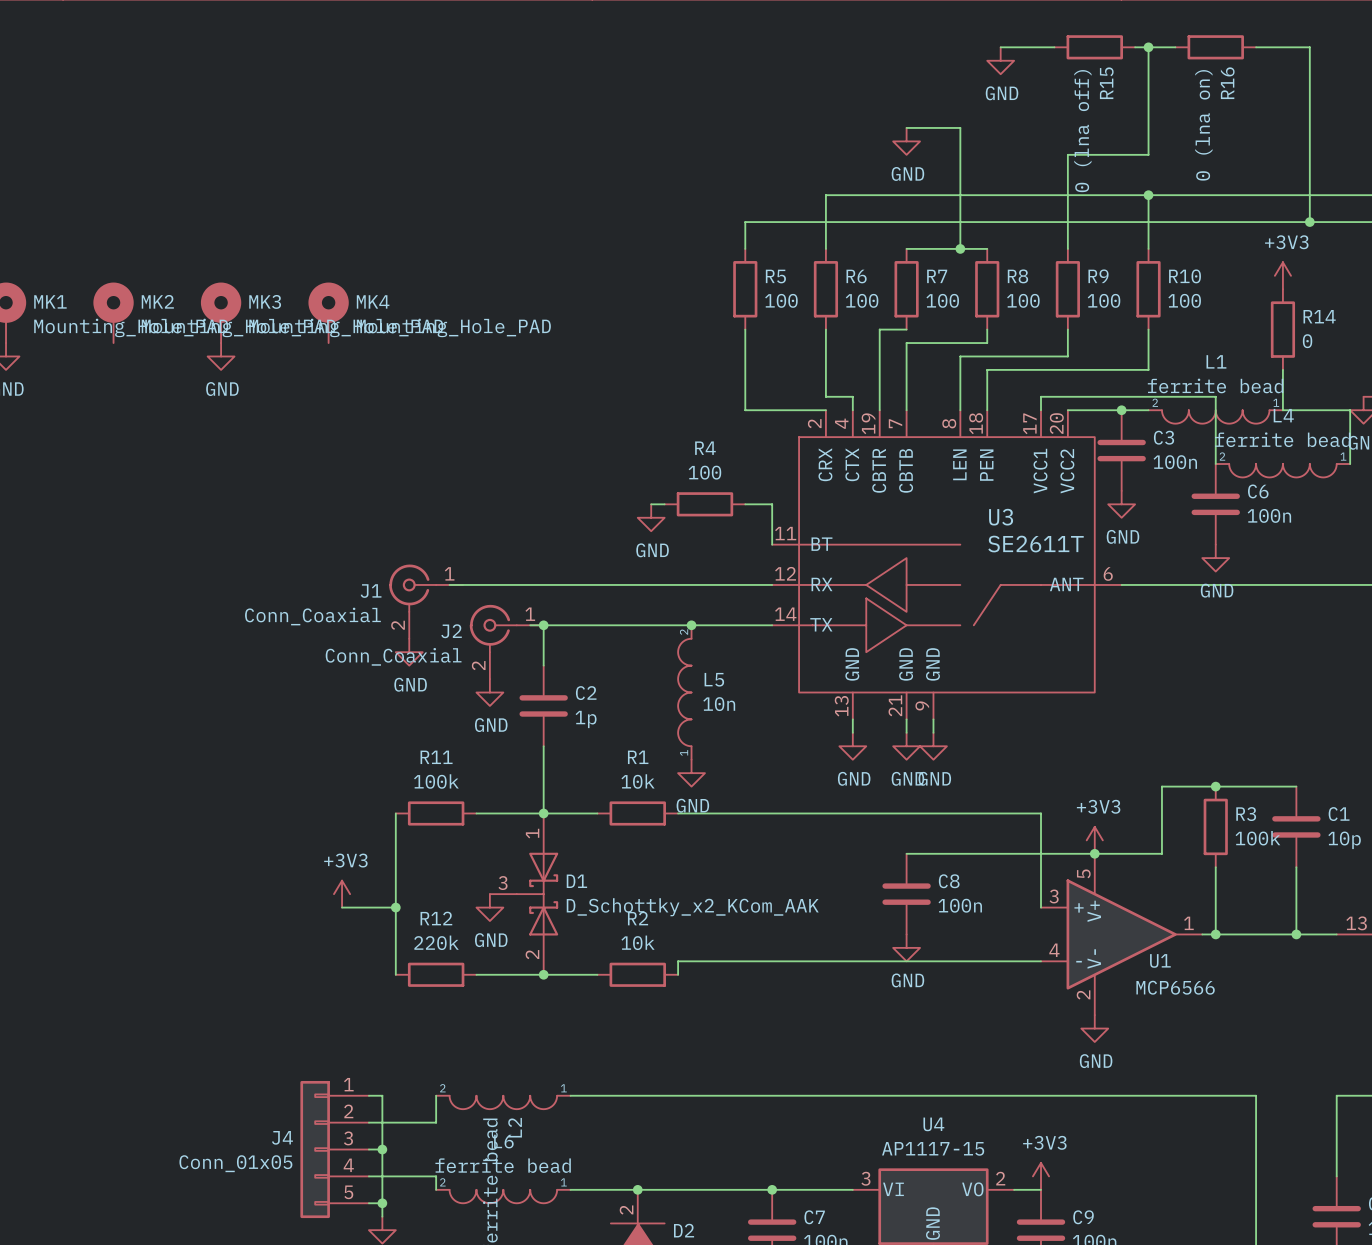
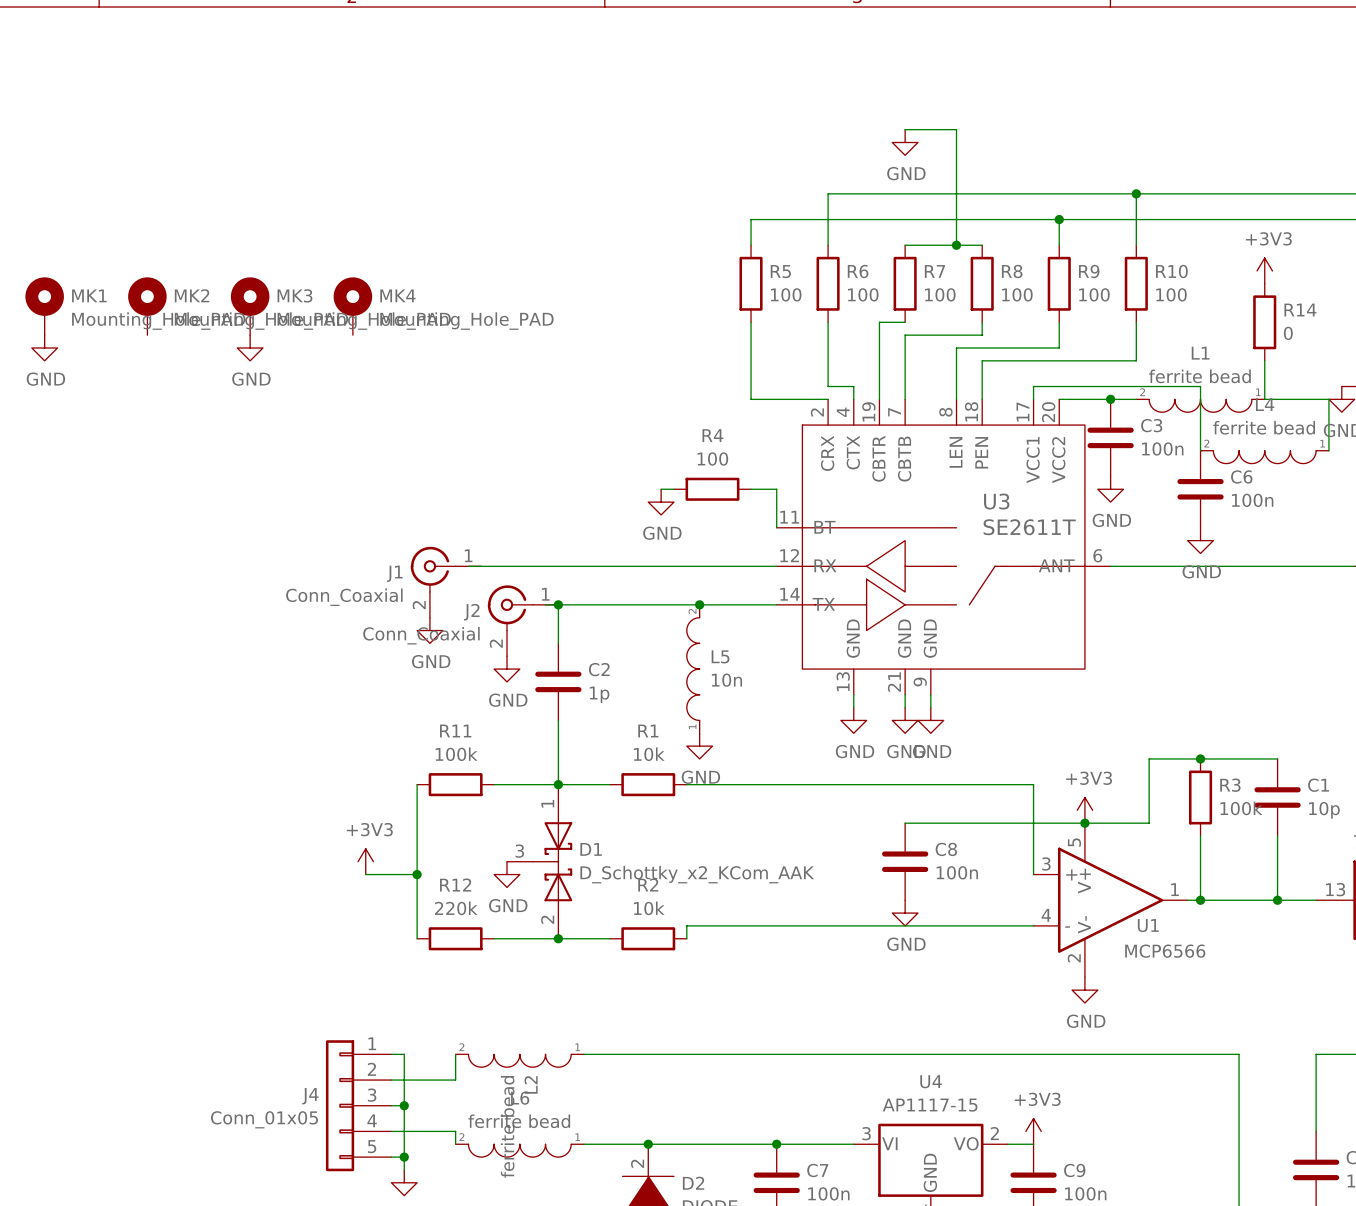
wire: (1000, 47) (1054, 47) -> none
R15: 0 (lna off) (1094, 47) -> none
wire: (1135, 47) (1175, 47) -> none
wire: (1148, 47) (1148, 154) (1067, 154) (1067, 222) -> none
junction: (1148, 47) -> none
R16: 0 (lna on) (1215, 47) -> none
wire: (1256, 47) (1309, 47) (1309, 222) -> none
power symbol: GND (1000, 60) -> none
junction: none -> (1059, 219)
junction: (1309, 222) -> none

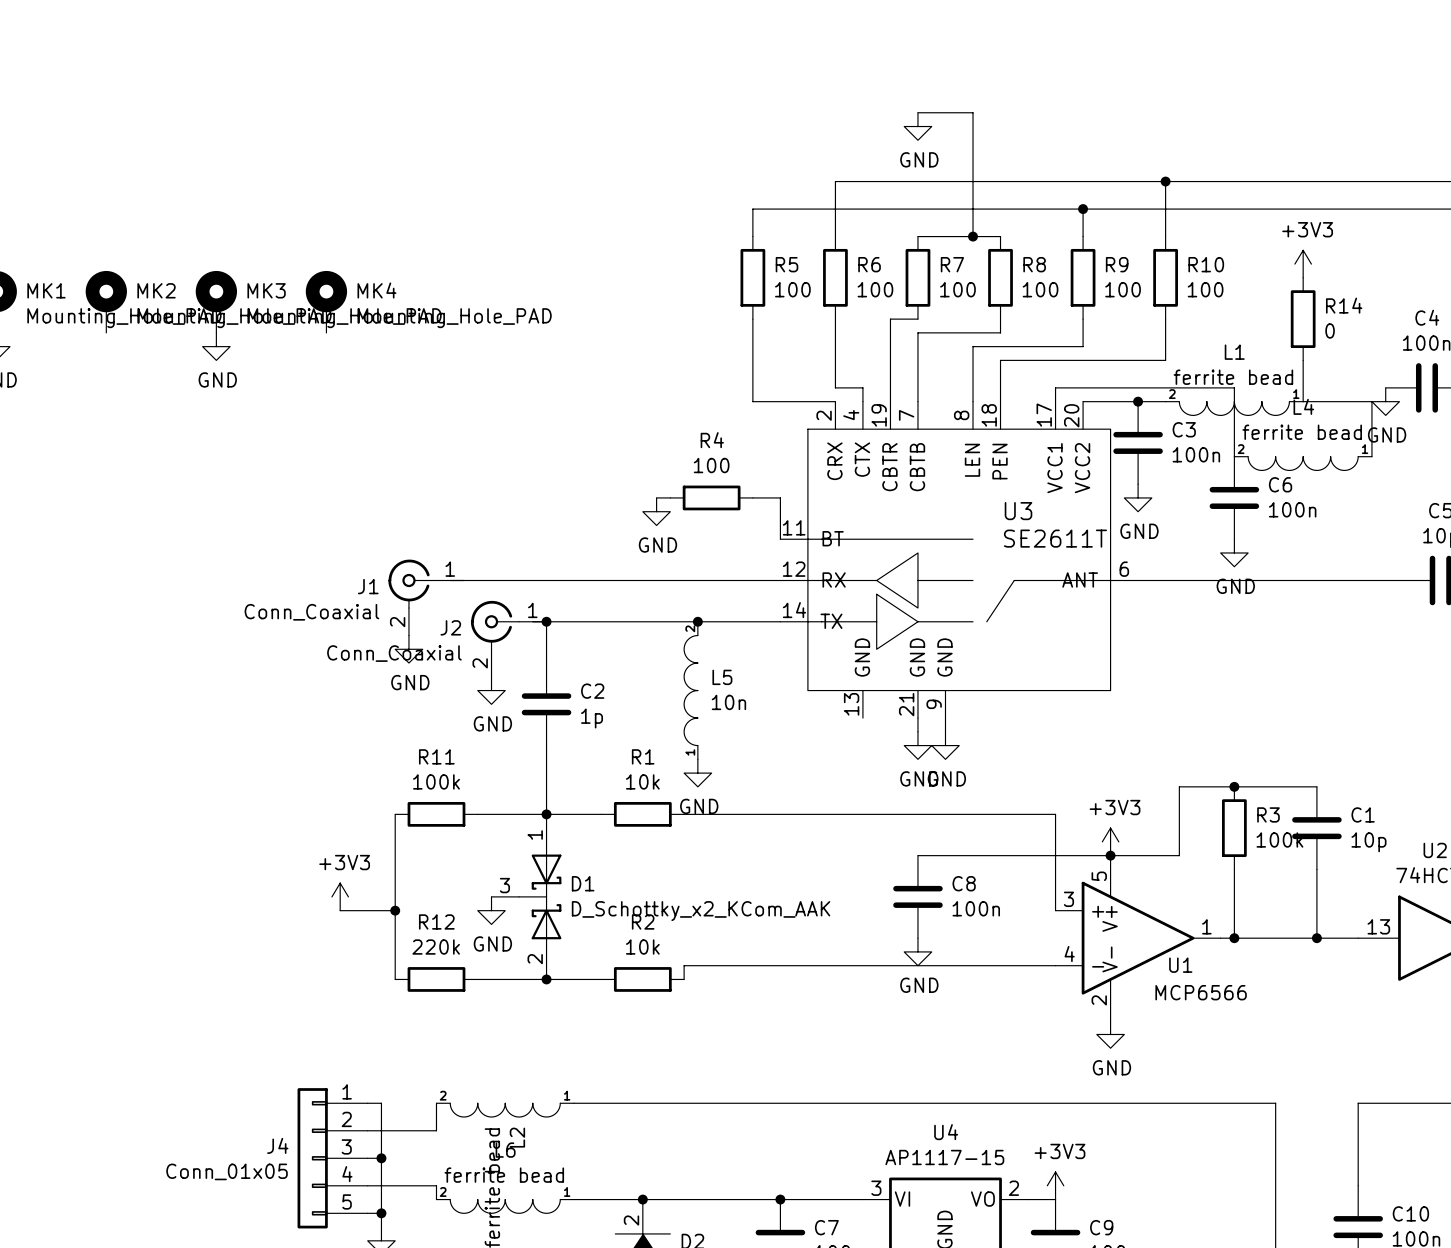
wire: (853, 694) (853, 707) -> none
power symbol: GND (853, 720) -> none

